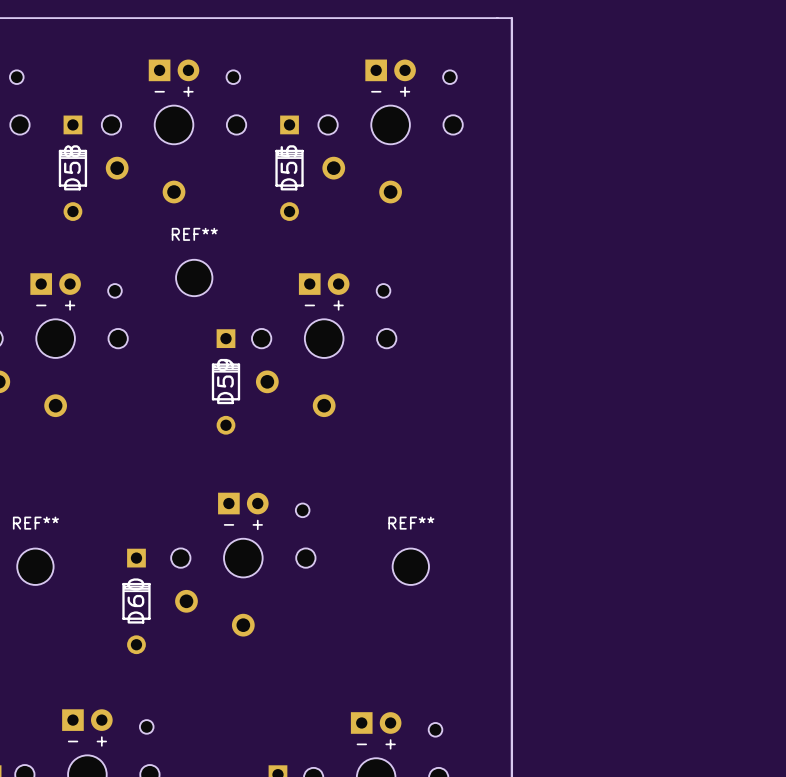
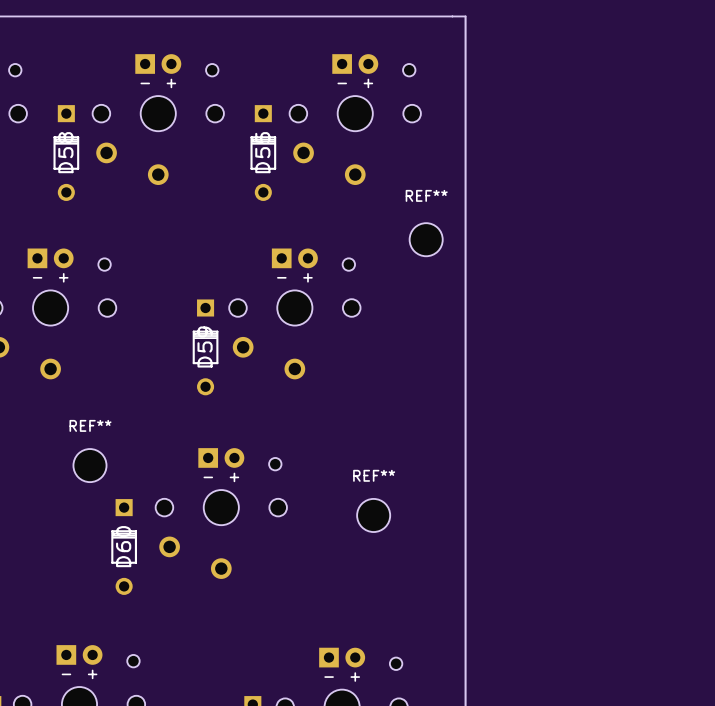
REF**: none -> (426, 239)
REF**: (194, 277) -> none
REF** position: (35, 566) -> (89, 465)

